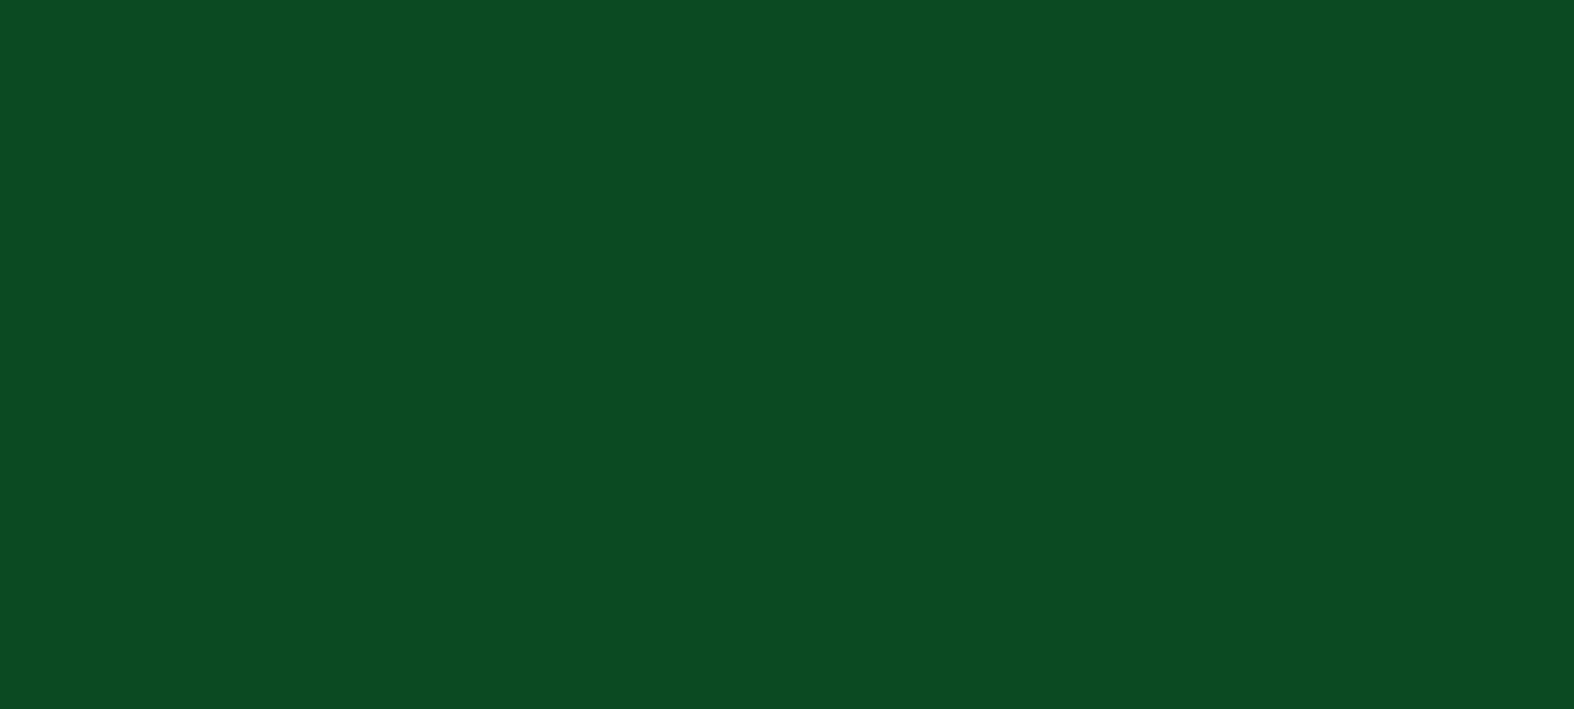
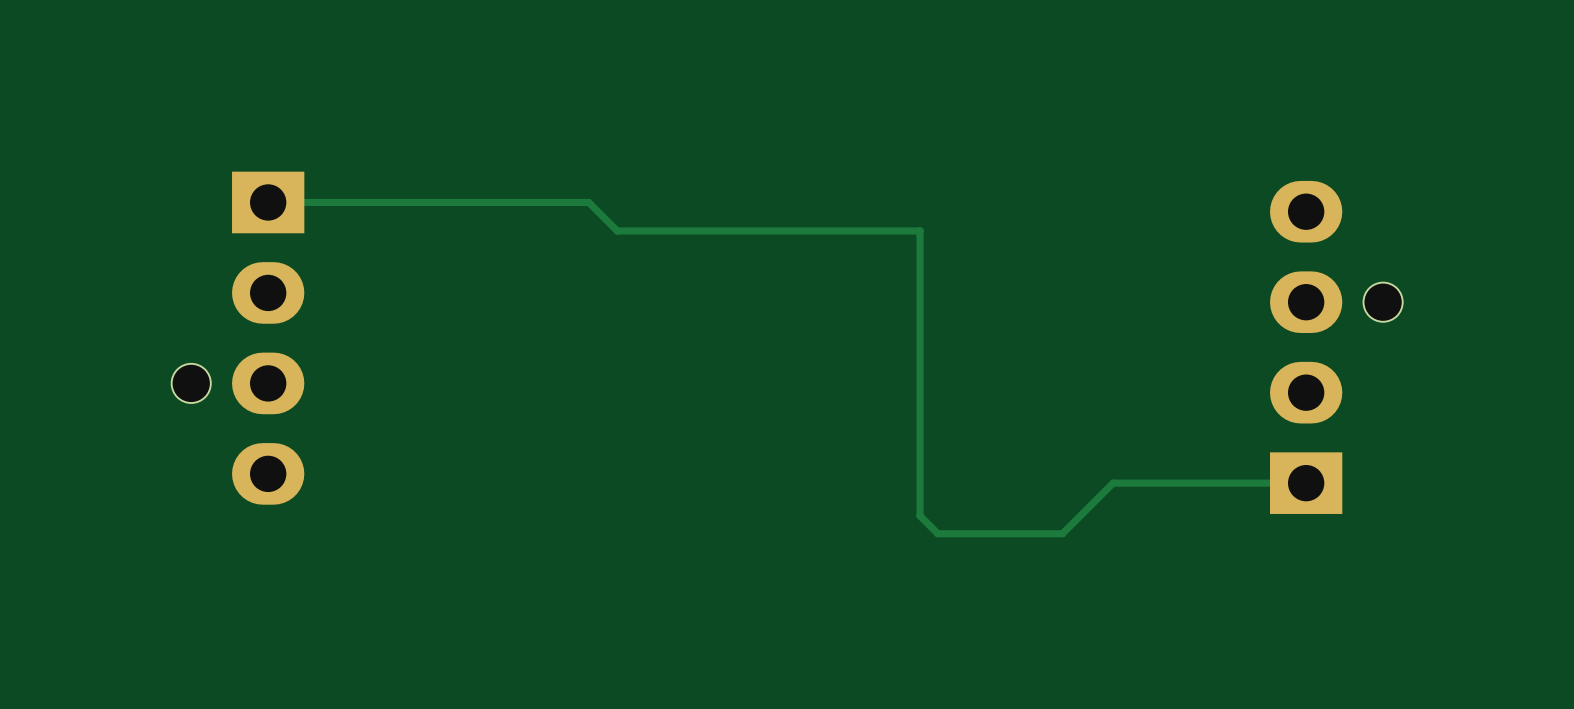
track: none -> (268, 202) (588, 202) (617, 230) (920, 230) (920, 515) (937, 533) (1062, 533) (1113, 483) (1306, 483)
part: none -> (237, 338)
part: none -> (1336, 347)

